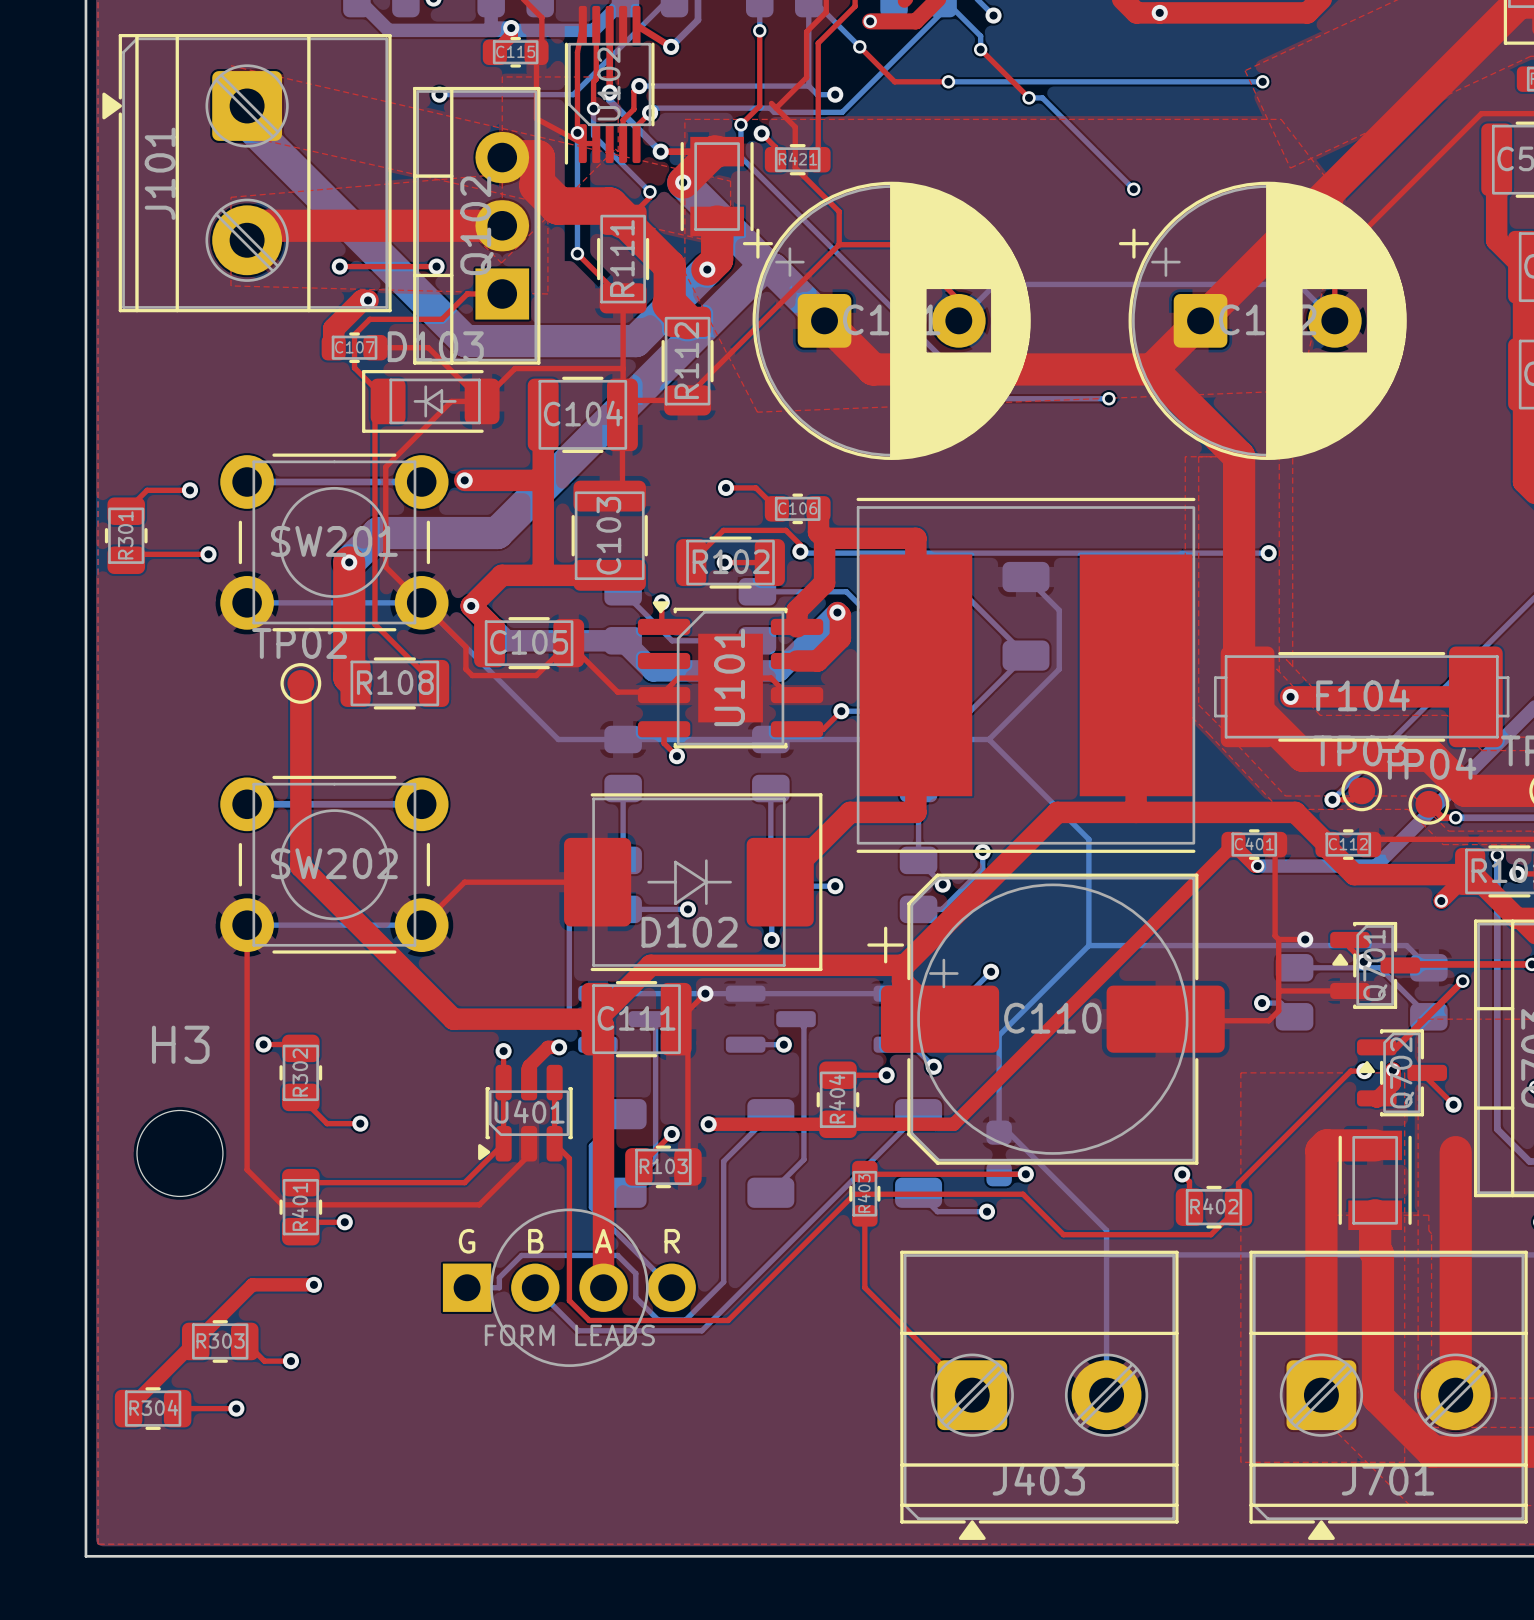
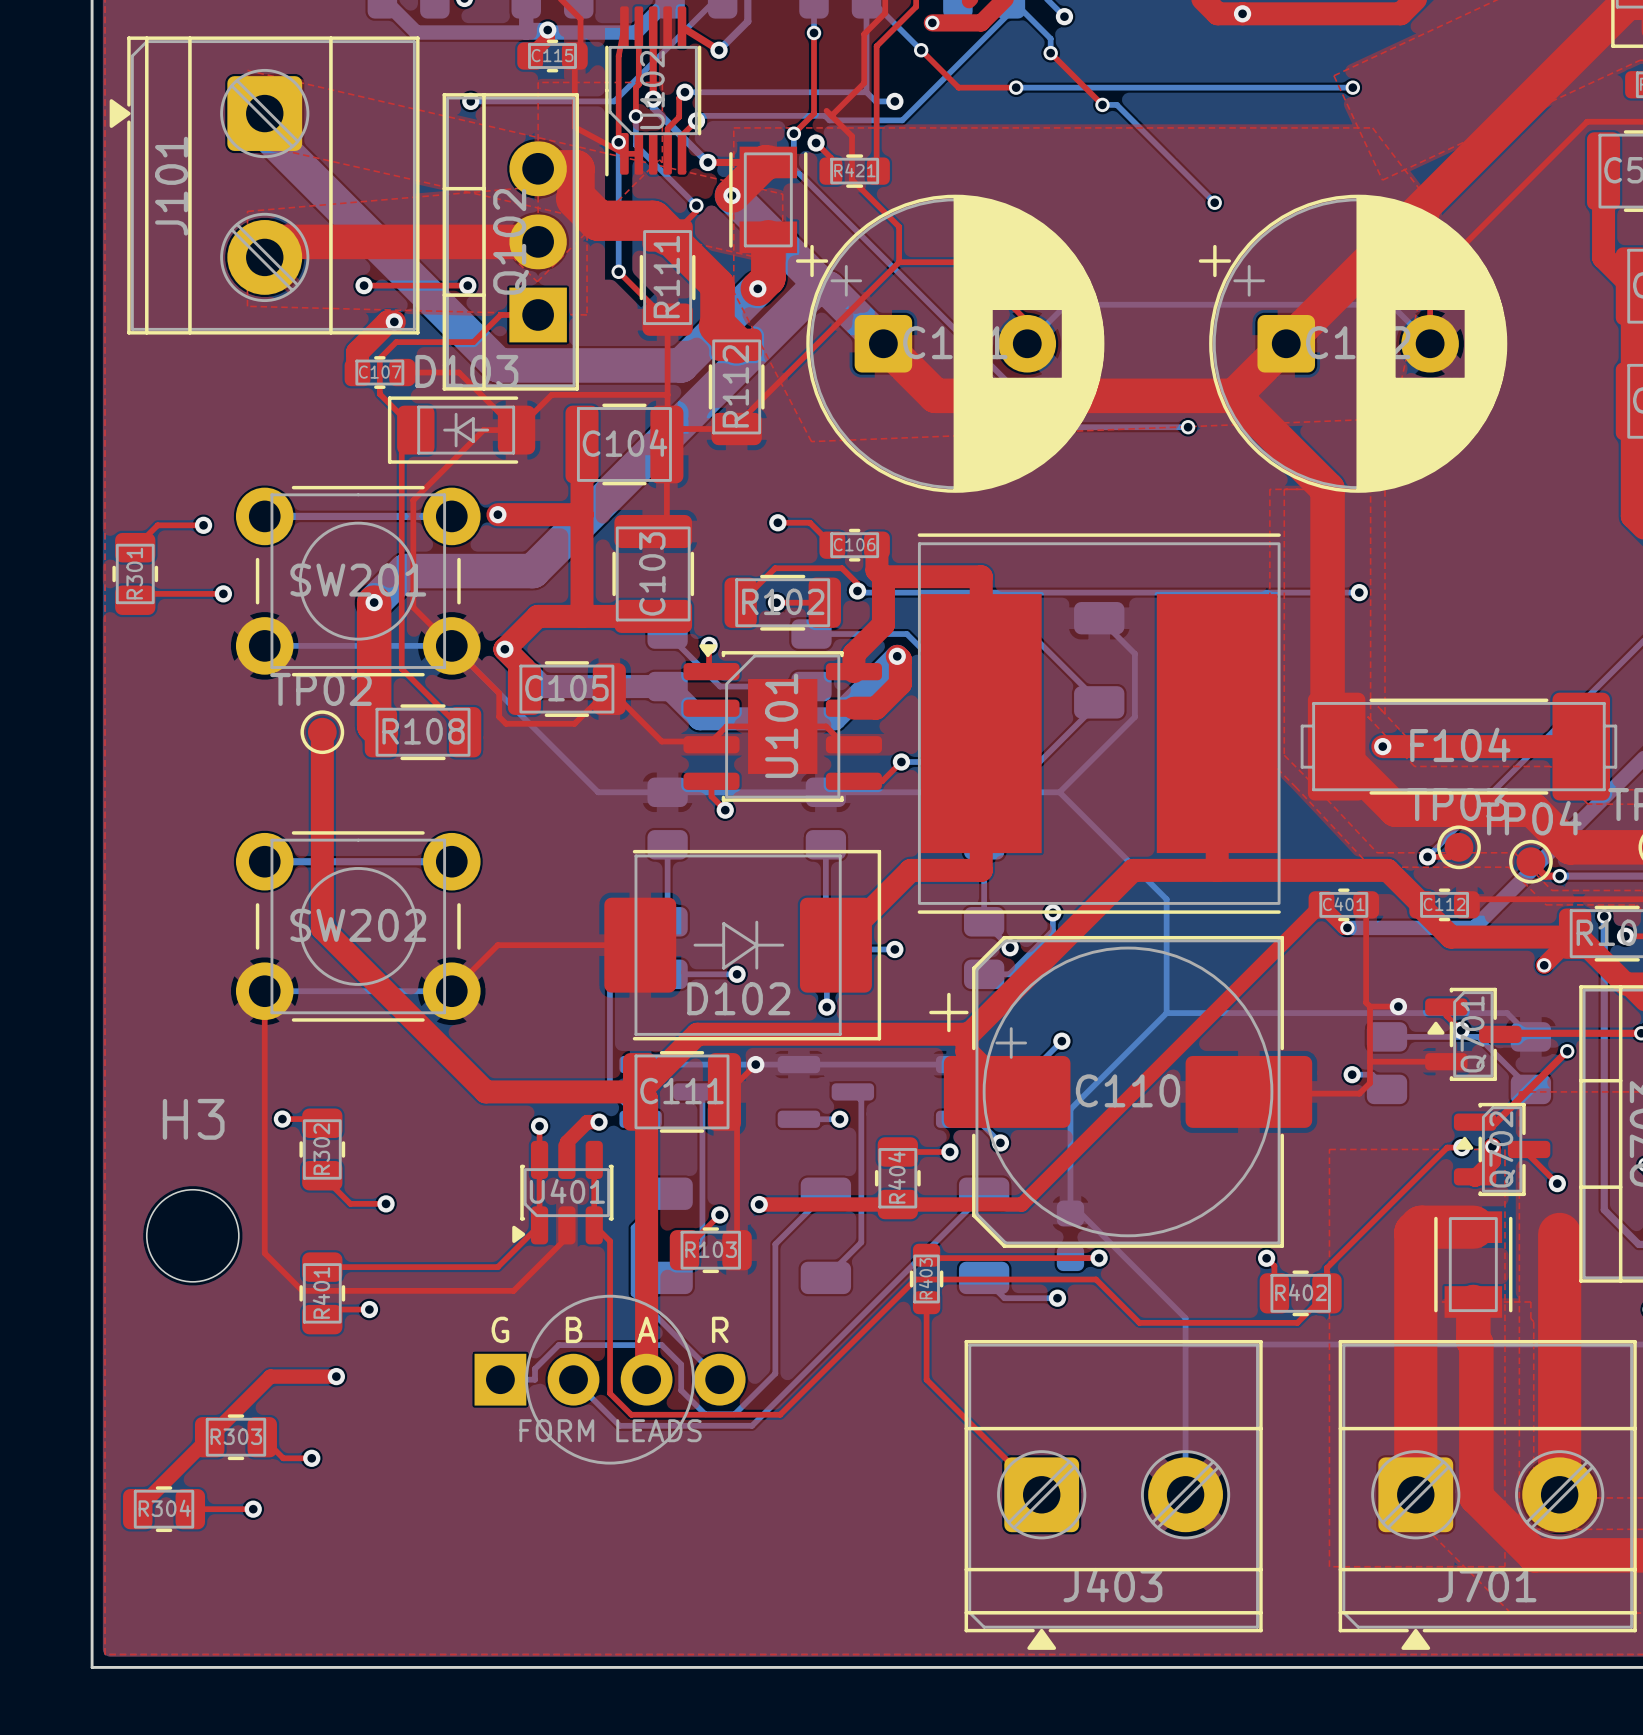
top track width: thin (1375, 1145) (1326, 1145) (1321, 1150) (1321, 1395) -> thick (1473, 1227) (1421, 1227) (1415, 1232) (1415, 1494)
top track width: thin (1455, 1152) (1455, 1395) -> thick (1559, 1234) (1559, 1494)

